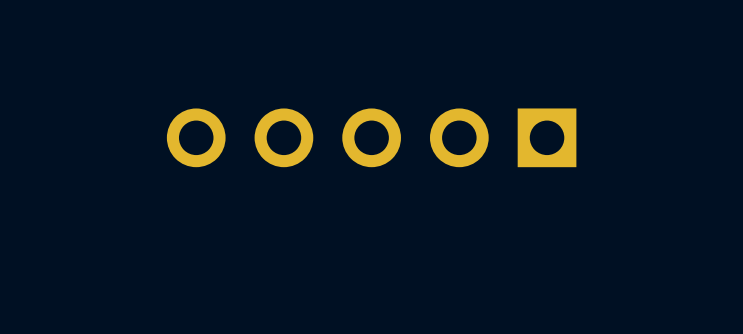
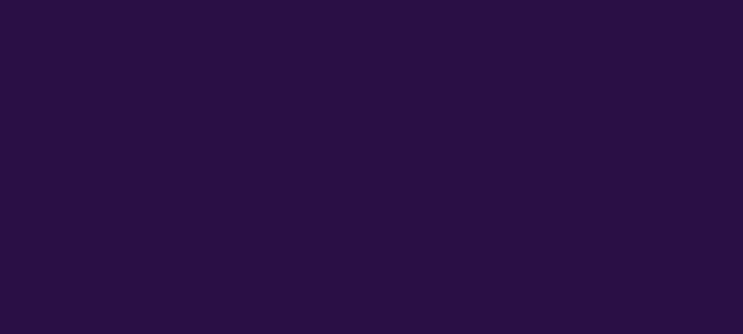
part: (371, 137) -> none

